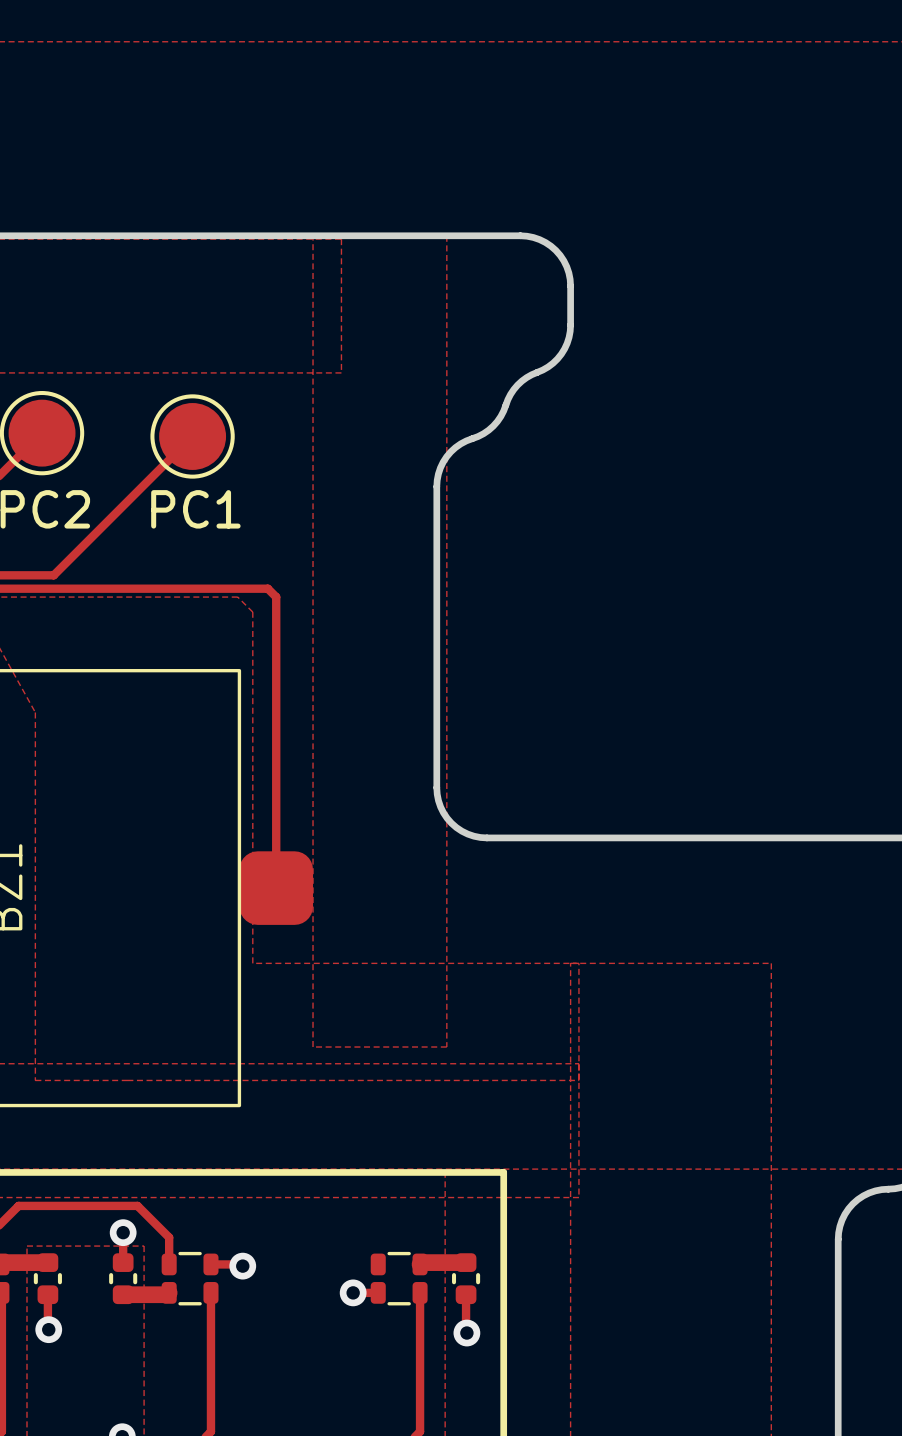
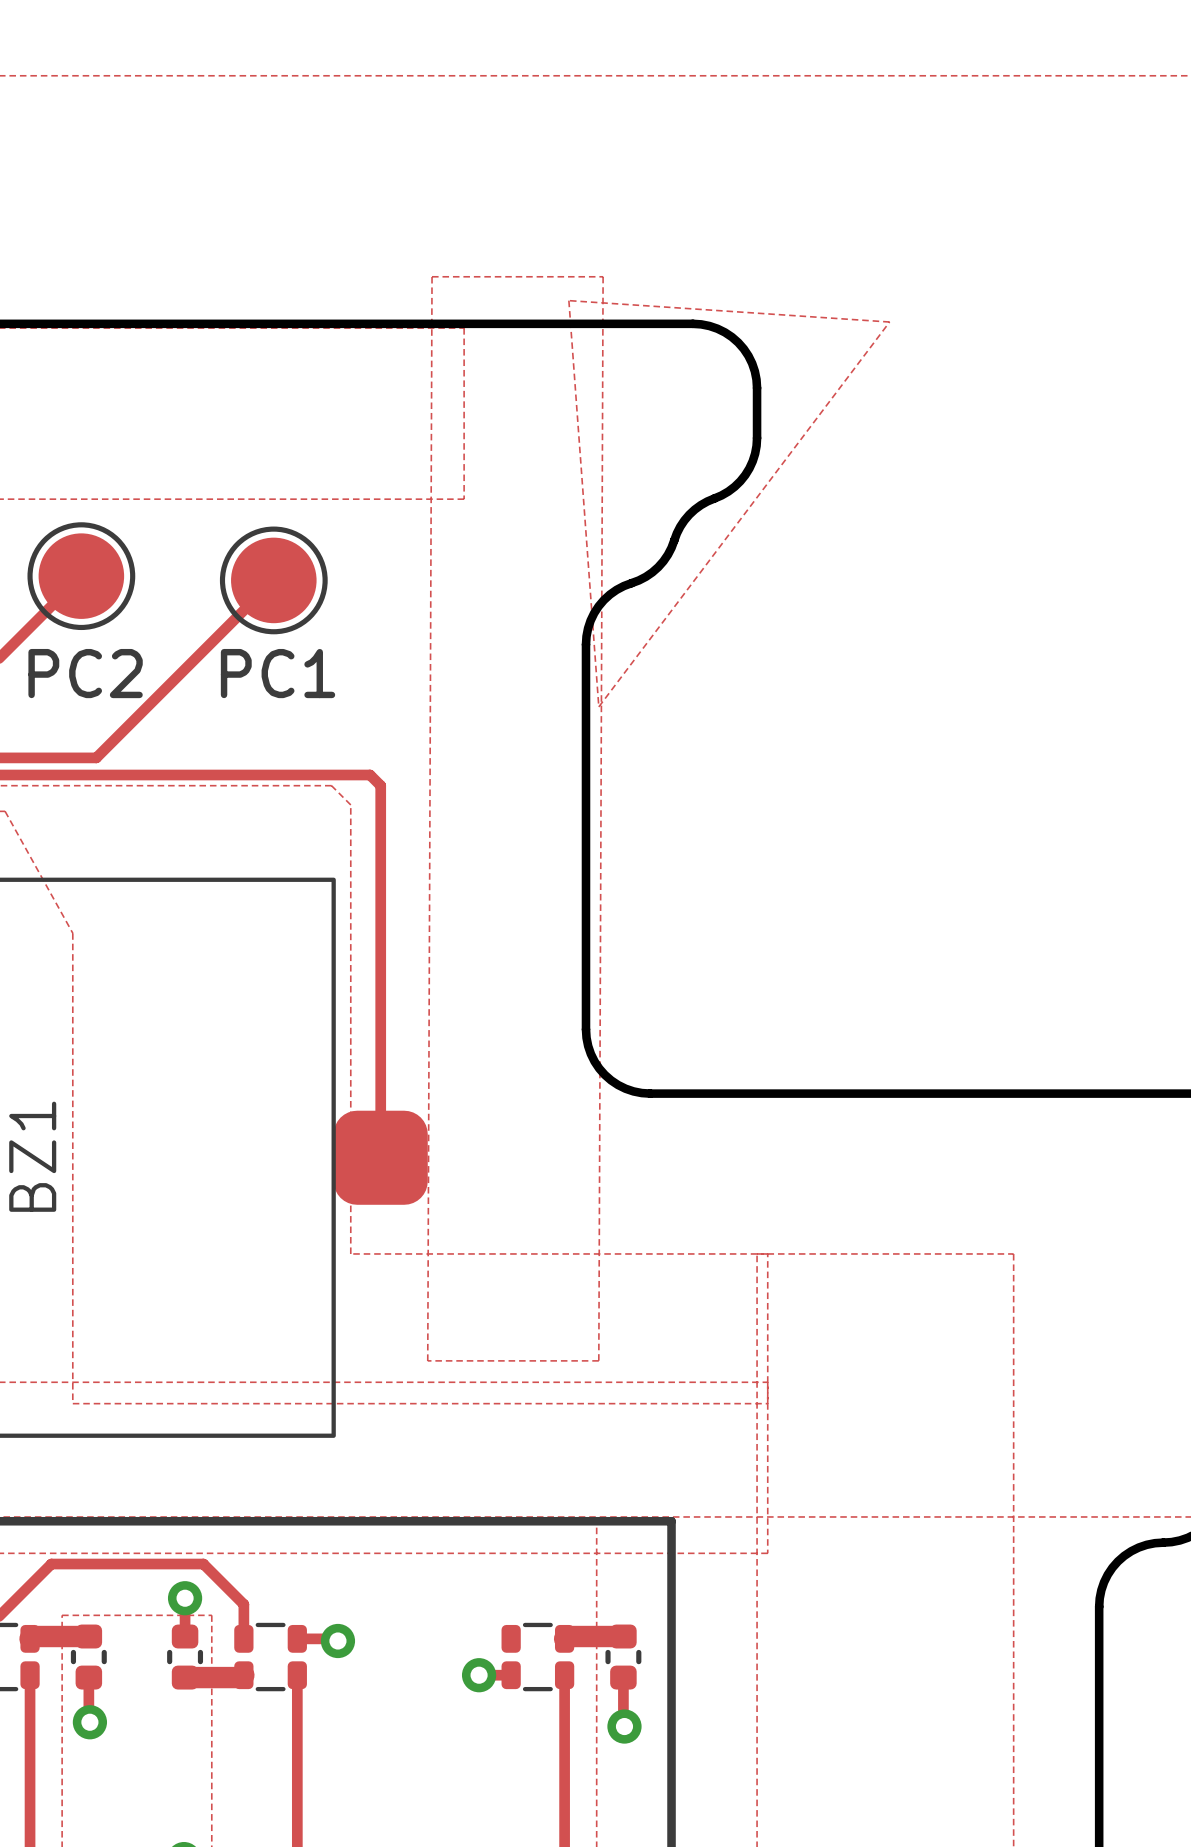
zone outline: none -> (568, 300) (598, 706) (889, 322) (568, 300)
zone outline: (313, 1047) (313, 235) (446, 235) (446, 1047) -> (427, 1360) (432, 276) (603, 276) (598, 1360)

